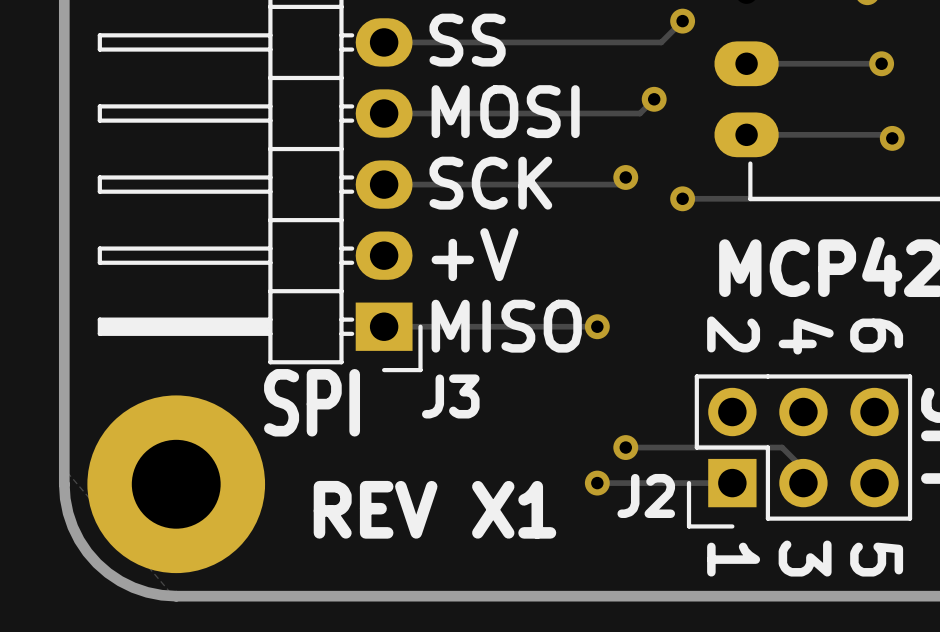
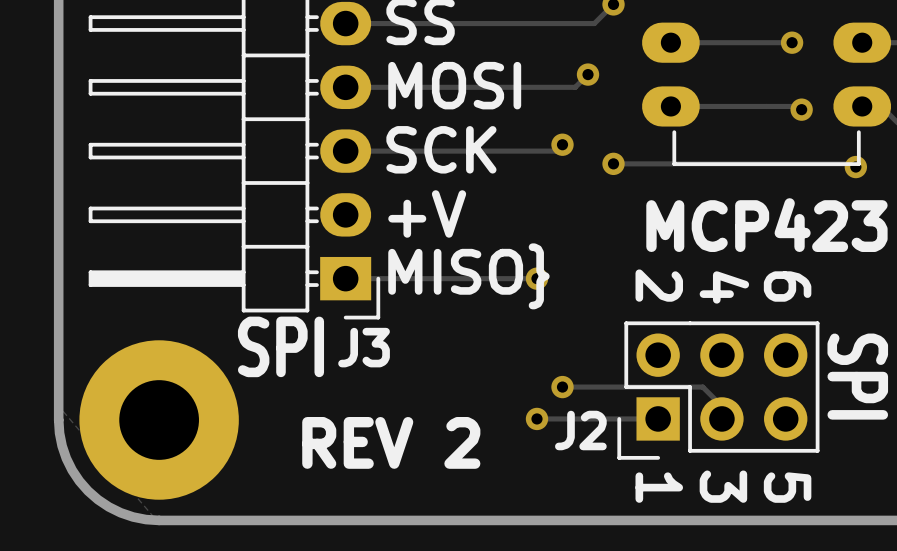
text: MISO (506, 326) -> MISO} (468, 276)
J3 name position: J3 (450, 396) -> J3 (364, 347)
text: REV X1 (434, 509) -> REV 2 (391, 442)

